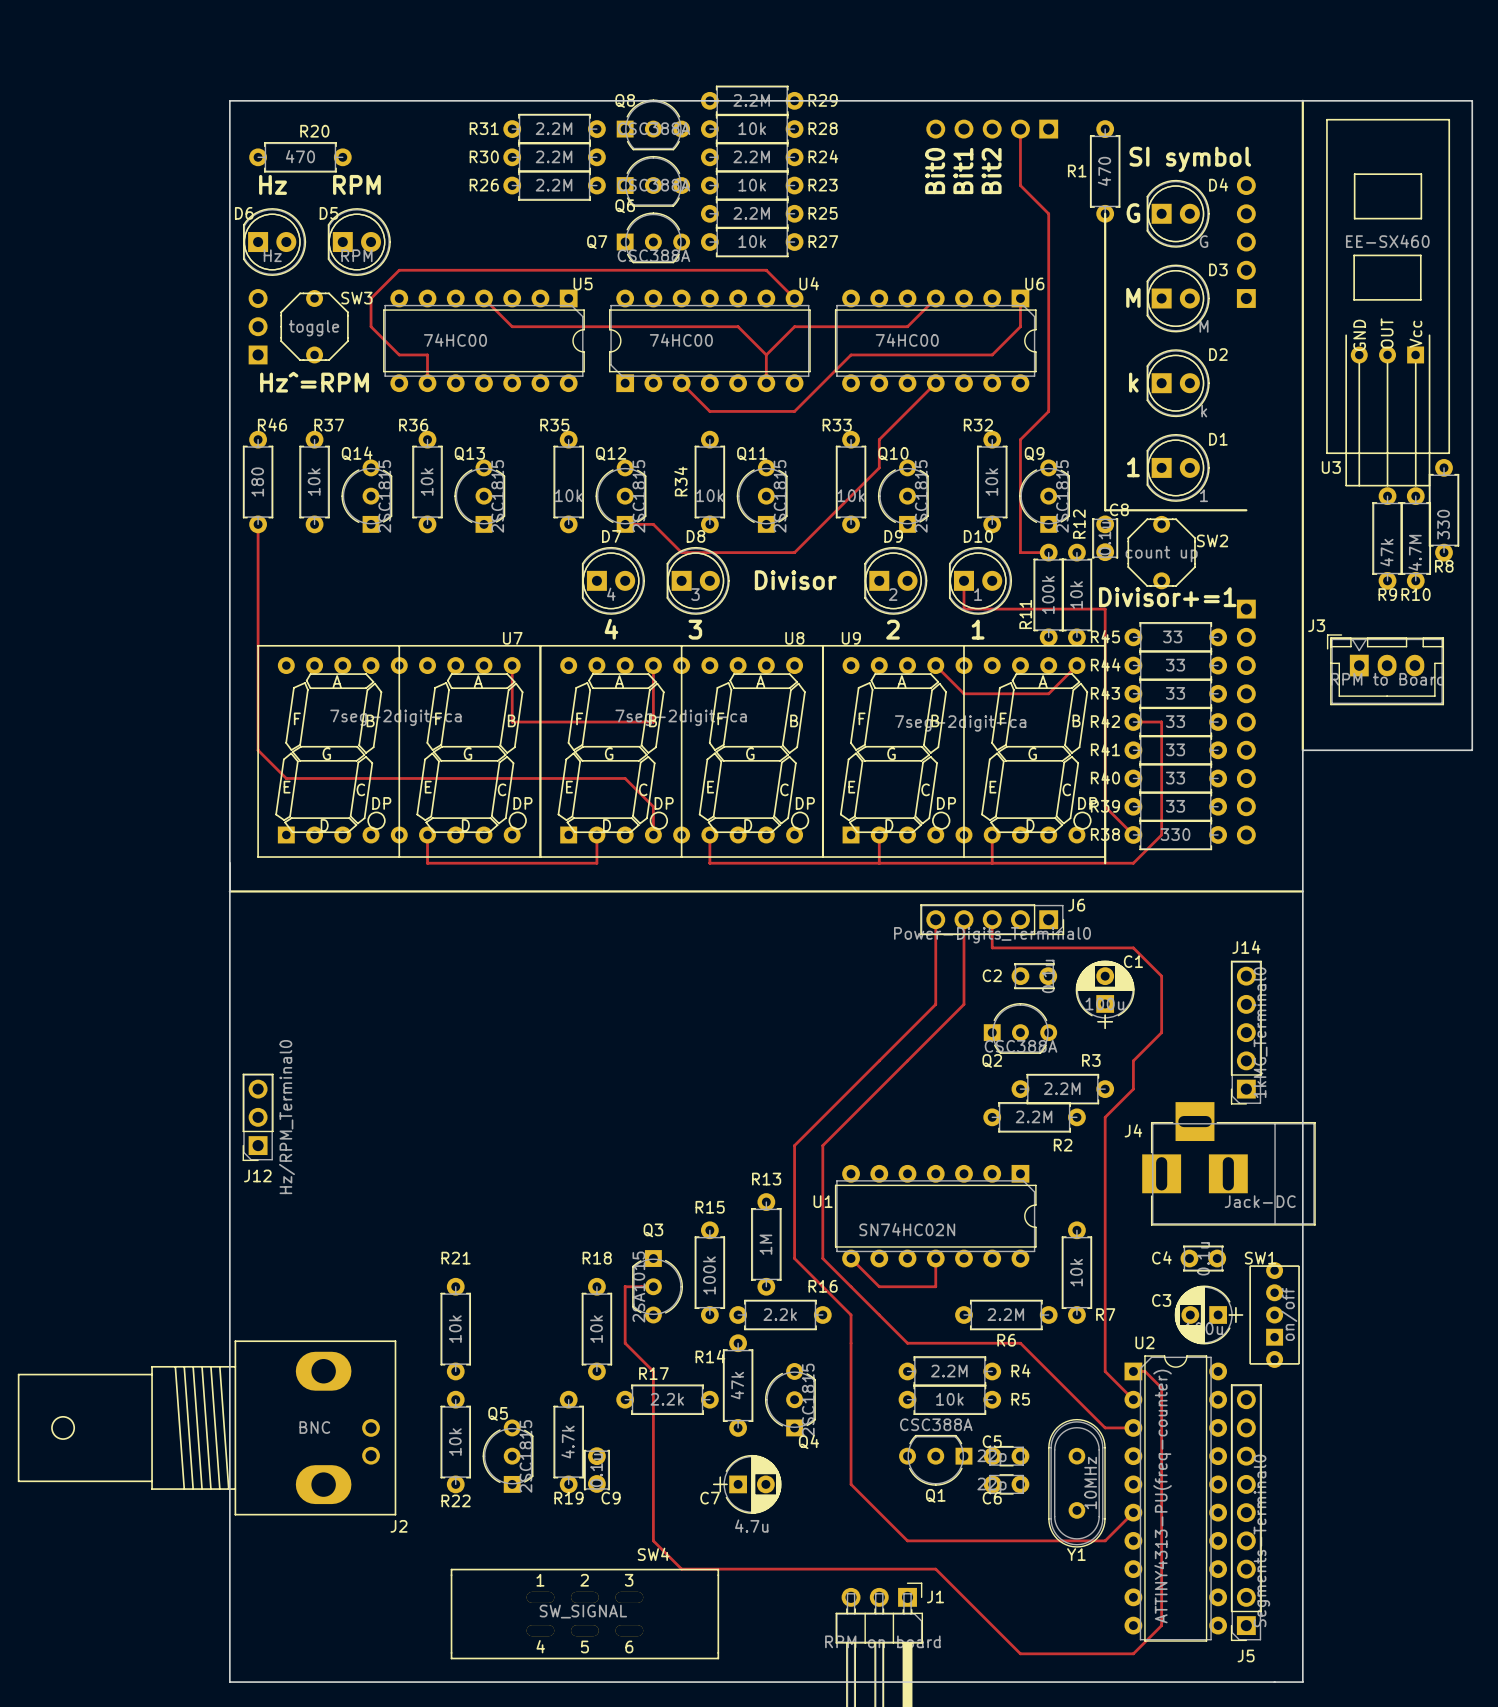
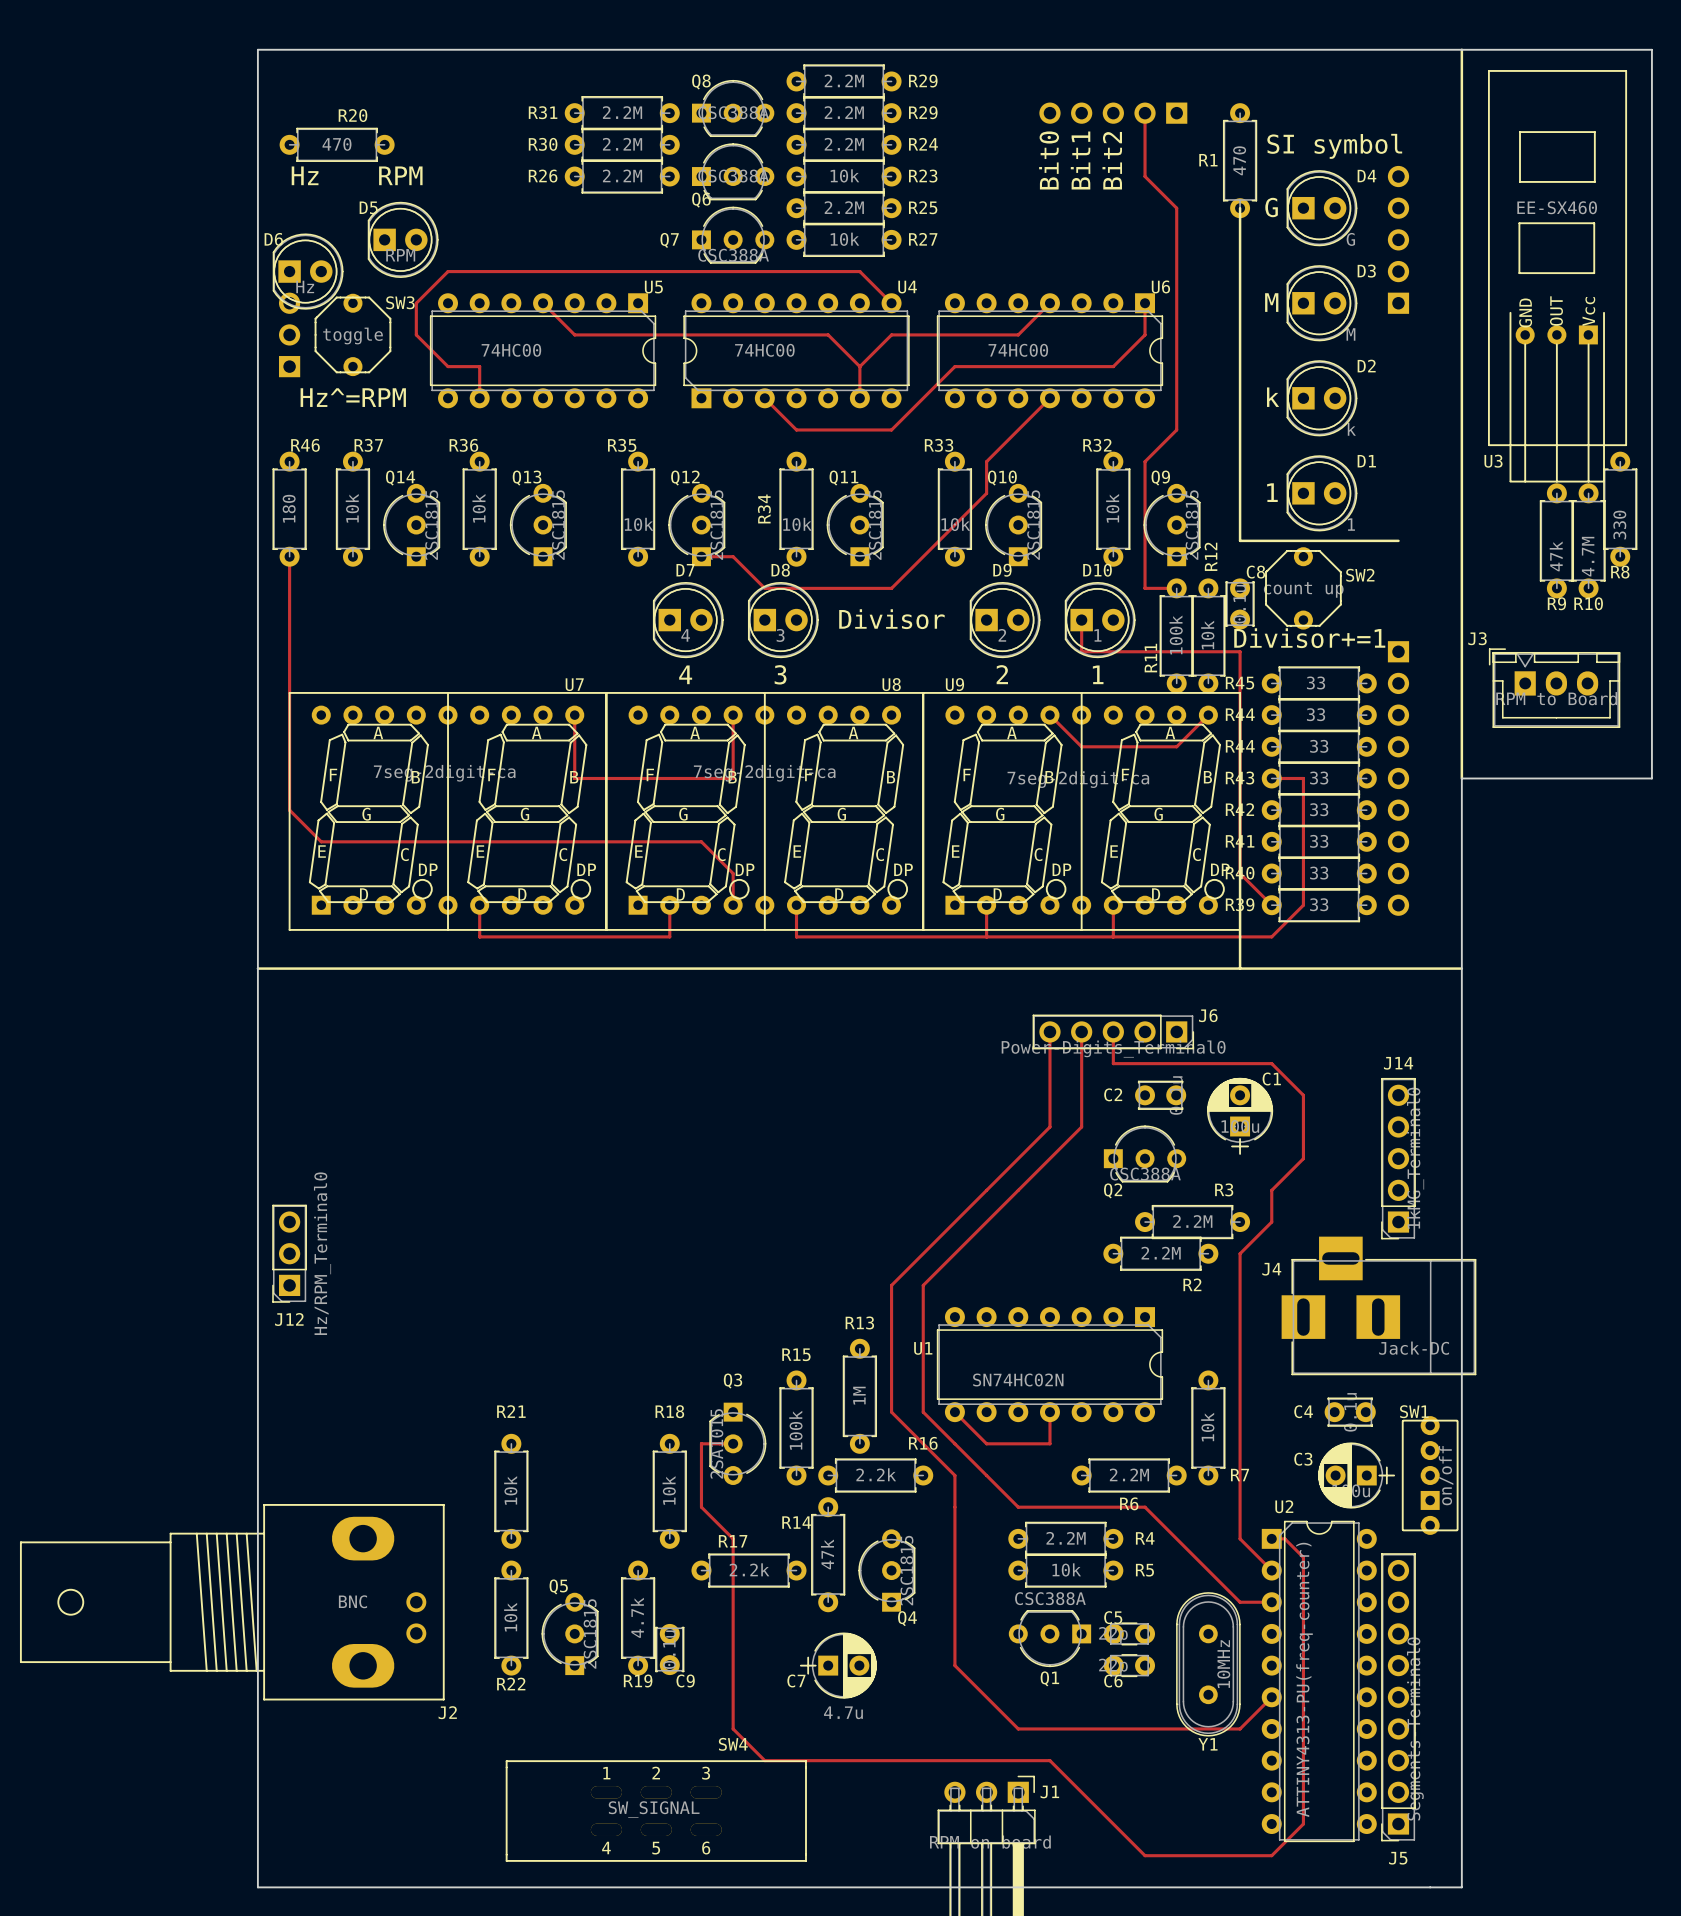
line: none -> (1461, 49) (1461, 113)
R29: none -> 2.2M (844, 81)
board edge: (229, 100) (1472, 100) -> (257, 113) (257, 49) (1651, 49) (1651, 113)
R31: none -> 2.2M (622, 113)
track: none -> (1145, 113) (1145, 144)
Q8 position: (653, 124) -> (733, 108)
R31 name: R31 (484, 128) -> R30 (543, 144)
R28 value: 10k (752, 128) -> 2.2M (844, 144)
R28 name: R28 (823, 128) -> R24 (923, 144)
part position: (992, 129) -> (1113, 113)
R30 name: R30 (484, 156) -> R26 (543, 176)
R24 value: 2.2M (751, 156) -> 10k (844, 175)
R24 name: R24 (823, 156) -> R23 (923, 176)
R20 position: (300, 157) -> (337, 144)
track: (1020, 157) (1020, 185) (1048, 213) -> (1145, 176) (1176, 208) (1176, 239)
text position: SI symbol (1190, 159) -> SI symbol (1334, 146)
text position: Bit0 (935, 171) -> Bit0 (1049, 160)
text position: Bit1 (963, 171) -> Bit1 (1080, 160)
text position: Bit2 (991, 171) -> Bit2 (1112, 160)
R1 position: (1105, 171) -> (1240, 160)
Q6 position: (653, 181) -> (733, 171)
text position: Hz (273, 184) -> Hz (305, 175)
text position: RPM (356, 184) -> RPM (400, 175)
R26: 2.2M (554, 185) -> none
R23 value: 10k (752, 185) -> 2.2M (844, 207)
R23 name: R23 (823, 185) -> R25 (923, 207)
line: none -> (1240, 208) (1240, 239)
R25 value: 2.2M (751, 213) -> 10k (844, 239)
R25 name: R25 (823, 213) -> R27 (923, 239)
text position: G (1133, 213) -> G (1271, 207)
D4 position: (1178, 213) -> (1321, 208)
Q7 position: (653, 237) -> (733, 235)
D5 position: (359, 242) -> (403, 239)
R27: 10k (752, 242) -> none
part position: (1246, 242) -> (1398, 239)
track: none -> (1049, 303) (1018, 334) (891, 334) (859, 366)
text position: M (1133, 297) -> M (1271, 302)
track: (483, 298) (512, 326) (738, 326) (766, 354) -> (543, 303) (574, 334) (828, 334) (859, 366)
track: (794, 298) (766, 270) (399, 270) (371, 298) (371, 326) (399, 354) (427, 354) (427, 383) -> (891, 303) (859, 271) (448, 271) (416, 303) (416, 334) (448, 366) (479, 366) (479, 398)
track: (935, 298) (907, 326) -> (1145, 303) (1145, 334) (1113, 366) (1018, 366)
track: (1020, 298) (1020, 326) (992, 354) (851, 354) (794, 411) (709, 411) (681, 383) -> none
D3 position: (1178, 298) -> (1321, 303)
U3 position: (1388, 302) -> (1557, 276)
part position: (258, 326) -> (289, 334)
SW3 position: (314, 326) -> (352, 334)
track: (851, 326) (794, 326) (766, 354) -> (954, 366) (891, 429) (796, 429) (764, 398)
U5 position: (483, 340) -> (543, 350)
U4 position: (709, 340) -> (796, 350)
U6 position: (935, 340) -> (1049, 350)
track: (766, 354) (766, 383) -> (859, 398) (859, 366)
text position: Hz^=RPM (314, 382) -> Hz^=RPM (353, 397)
text position: k (1133, 382) -> k (1273, 397)
track: (935, 383) (879, 439) (879, 467) (794, 552) (681, 552) (653, 524) (625, 524) -> (1049, 398) (986, 461) (986, 493) (891, 588) (764, 588) (733, 556) (701, 556)
track: (1048, 383) (1048, 411) (1020, 439) -> (1176, 429) (1145, 461) (1145, 493)
D2 position: (1178, 383) -> (1321, 398)
text position: 1 (1133, 467) -> 1 (1272, 492)
D1 position: (1178, 467) -> (1321, 493)
R46 position: (258, 482) -> (289, 509)
R37 position: (314, 482) -> (352, 509)
R36 position: (427, 482) -> (479, 509)
R35 position: (568, 482) -> (638, 509)
R34 position: (709, 482) -> (796, 509)
R33 position: (851, 482) -> (954, 509)
R32 position: (992, 482) -> (1113, 509)
line: (1105, 482) (1105, 510) (1246, 510) -> (1240, 540) (1398, 540)
track: none -> (289, 556) (289, 588)
Q14 position: (366, 496) -> (411, 525)
Q13 position: (479, 496) -> (538, 525)
Q12 position: (620, 496) -> (696, 525)
Q11 position: (762, 496) -> (855, 525)
Q10 position: (903, 496) -> (1013, 525)
Q9 position: (1044, 496) -> (1172, 525)
R8 position: (1444, 510) -> (1620, 509)
track: (1020, 524) (1020, 552) (1048, 552) -> (1145, 588) (1176, 588)
R9 position: (1387, 538) -> (1556, 540)
R10 position: (1415, 538) -> (1588, 540)
SW2 position: (1161, 552) -> (1303, 588)
D7 position: (613, 580) -> (688, 620)
D8 position: (698, 580) -> (783, 620)
text position: Divisor (795, 580) -> Divisor (891, 619)
D9 position: (895, 580) -> (1005, 620)
track: (963, 580) (963, 609) (1105, 609) -> (1081, 620) (1081, 651) (1240, 651) (1240, 683)
D10 position: (980, 580) -> (1100, 620)
R11 position: (1048, 594) -> (1176, 635)
R12 position: (1076, 594) -> (1208, 635)
text position: Divisor+=1 (1167, 597) -> Divisor+=1 (1309, 638)
R45: none -> 33 (1319, 683)
text position: 4 (611, 629) -> 4 (685, 674)
text position: 3 (695, 629) -> 3 (780, 674)
text position: 2 (893, 629) -> 2 (1002, 674)
text position: 1 (978, 629) -> 1 (1098, 674)
R45 name: R45 (1105, 636) -> R44 (1240, 714)
track: none -> (574, 715) (574, 746)
track: none -> (733, 715) (733, 746)
track: (935, 665) (963, 693) (1048, 693) (1076, 665) -> (1049, 715) (1081, 746) (1176, 746) (1208, 715)
J3 position: (1385, 669) -> (1554, 688)
track: (512, 693) (512, 722) (653, 722) (653, 693) -> (574, 778) (733, 778)
line: (1302, 693) (1302, 750) -> none
board edge: (1472, 693) (1472, 750) (1302, 750) -> (1651, 778) (1461, 778) (1461, 841)
track: (258, 722) (258, 750) (286, 778) (625, 778) (653, 806) (653, 834) -> (289, 810) (321, 841) (701, 841) (733, 873) (733, 905)
track: (1133, 722) (1161, 722) -> (1271, 778) (1303, 778) (1303, 810)
part position: (1246, 722) -> (1398, 778)
U7 position: (399, 751) -> (448, 811)
U8 position: (681, 751) -> (764, 811)
U9 position: (963, 751) -> (1081, 811)
track: (1105, 778) (1105, 806) (1133, 834) -> (1240, 873) (1271, 905)
track: (1161, 806) (1161, 834) (1133, 863) (709, 863) (709, 834) -> (1303, 905) (1271, 936) (796, 936) (796, 905)
track: (427, 834) (427, 863) (596, 863) (596, 834) -> (479, 905) (479, 936) (669, 936) (669, 905)
track: (879, 834) (879, 863) -> (986, 936) (986, 905)
track: (992, 834) (992, 863) -> (1113, 936) (1113, 905)
R38: 330 (1175, 834) -> none
line: (229, 891) (1302, 891) -> (257, 968) (1461, 968)

